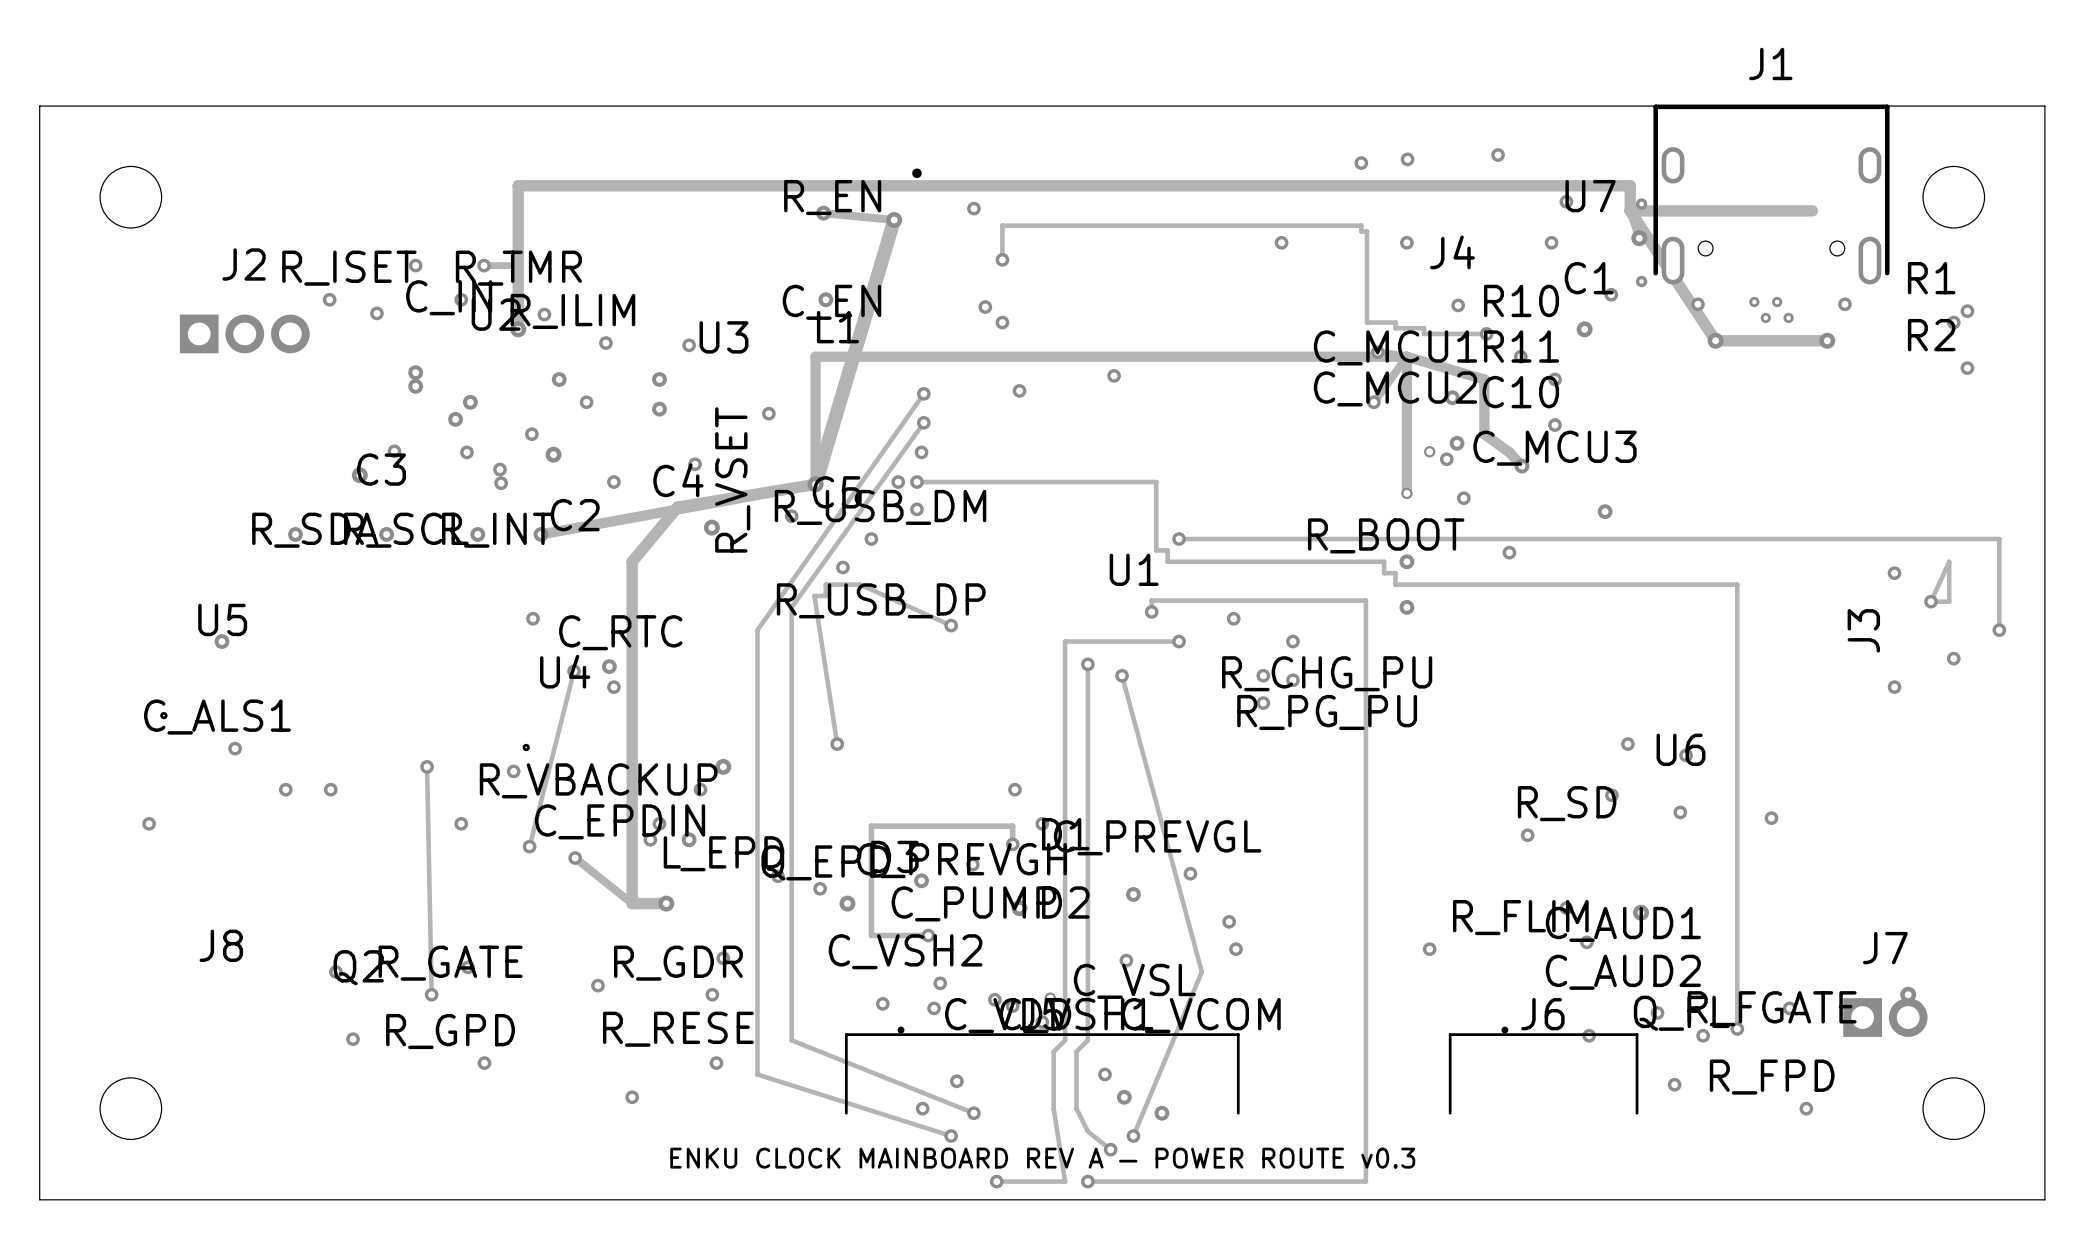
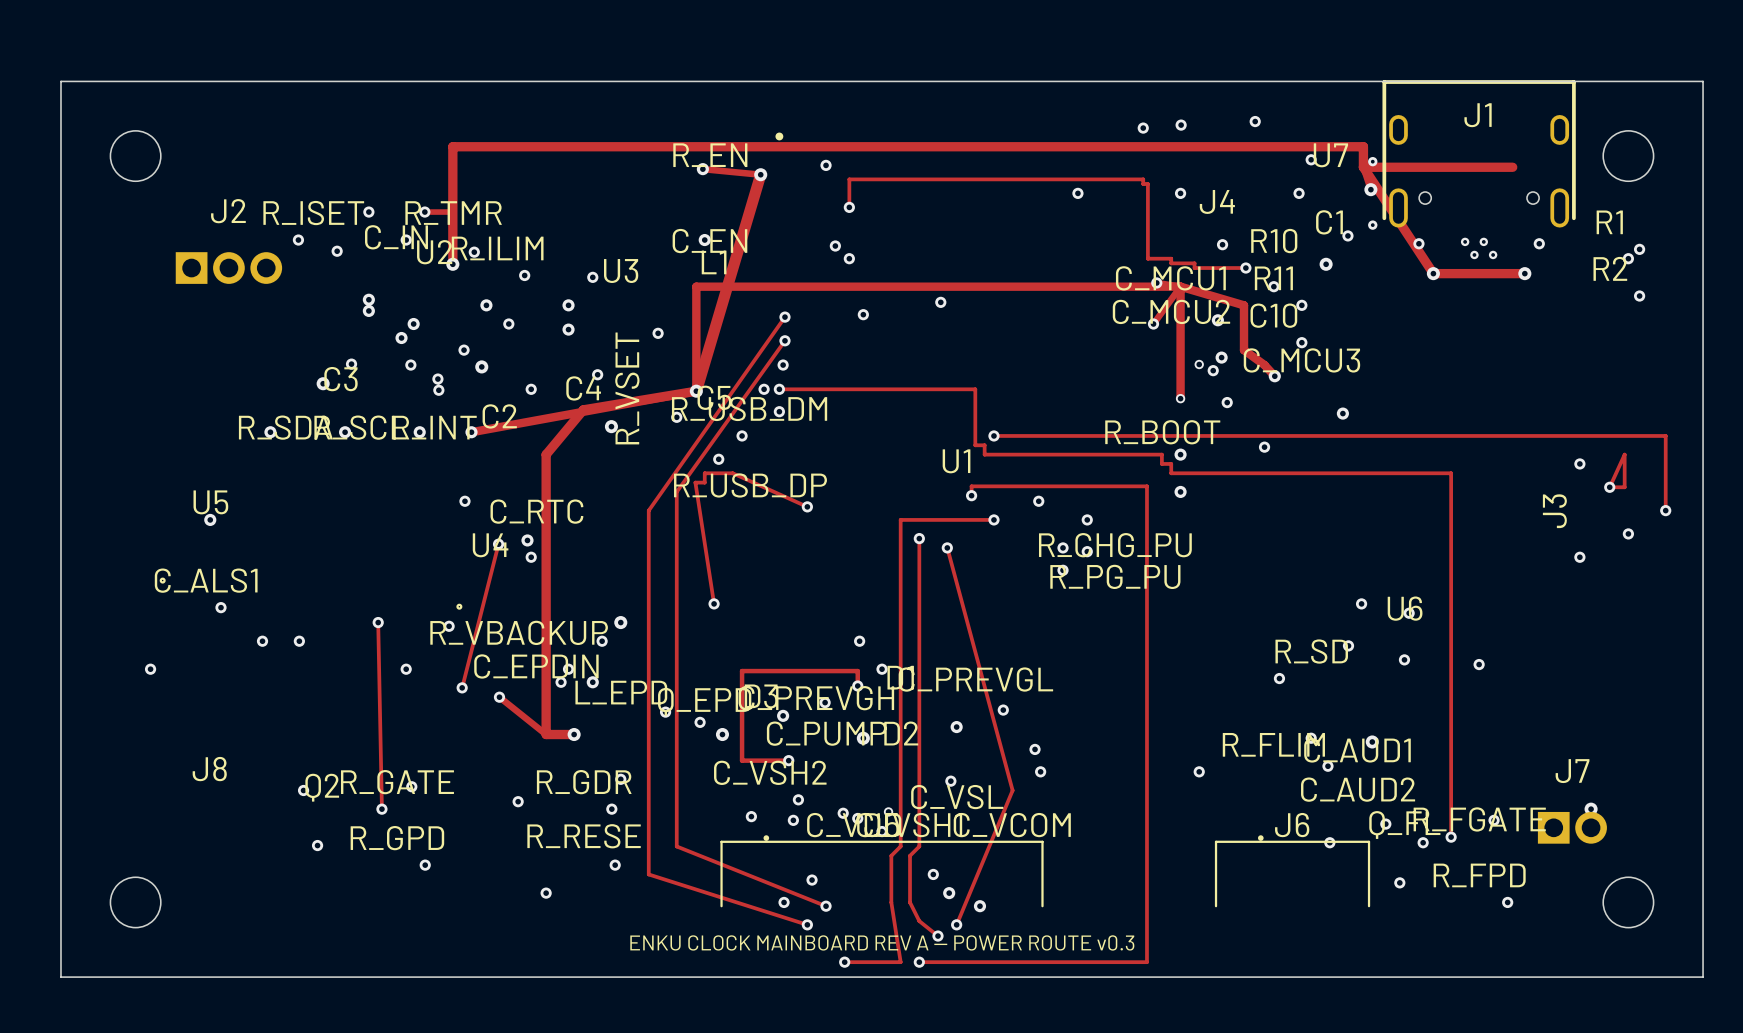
J1 name position: J1 (1770, 63) -> J1 (1478, 115)

